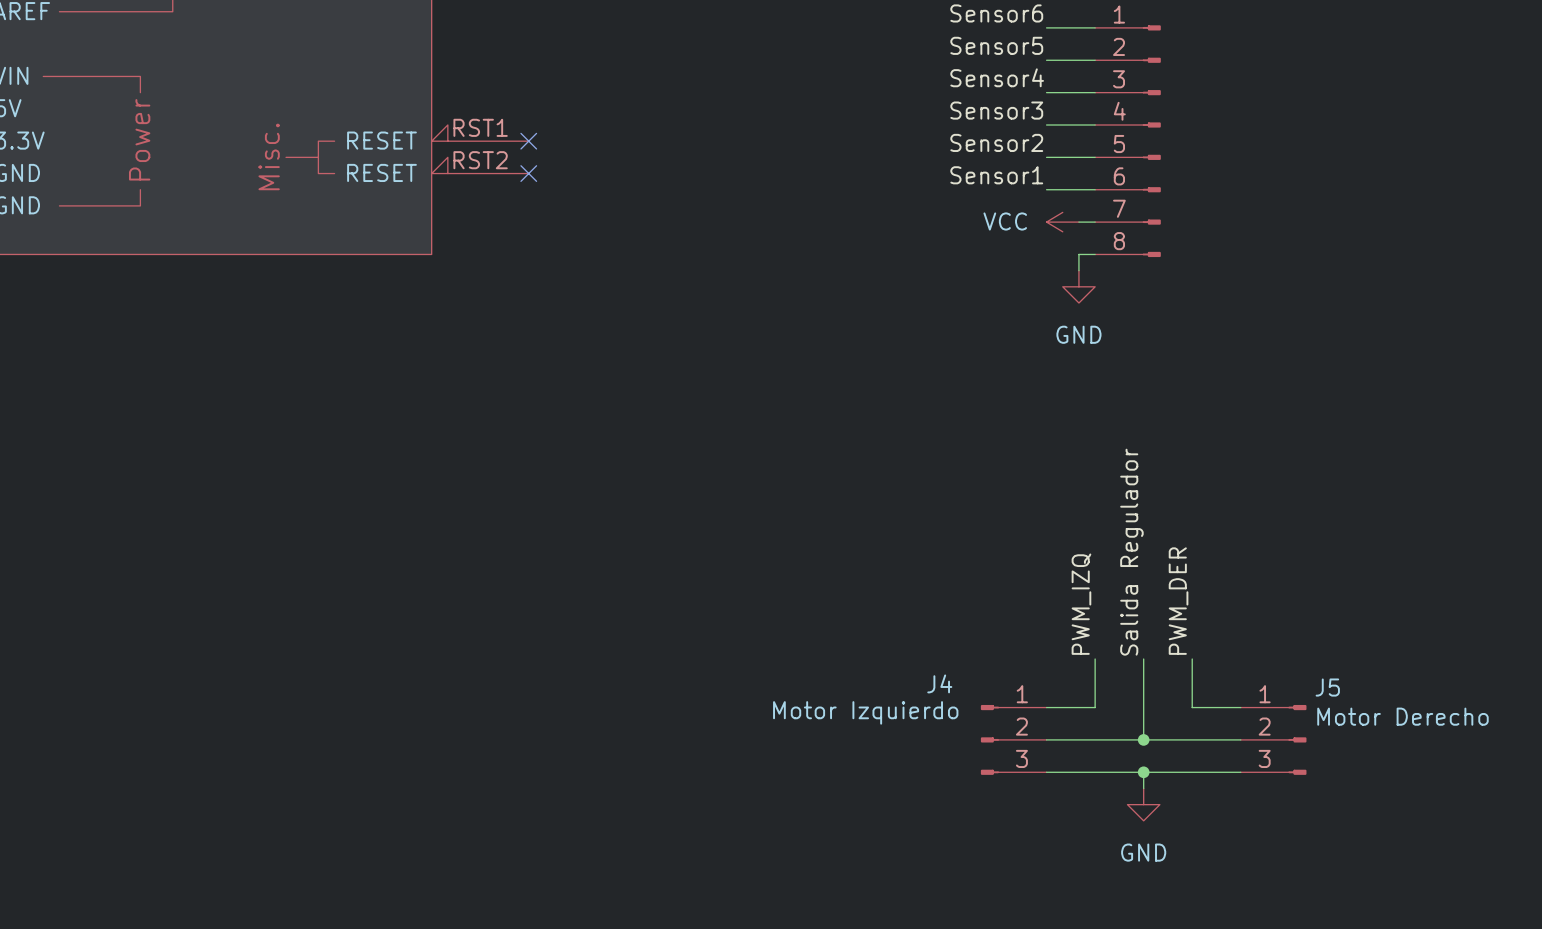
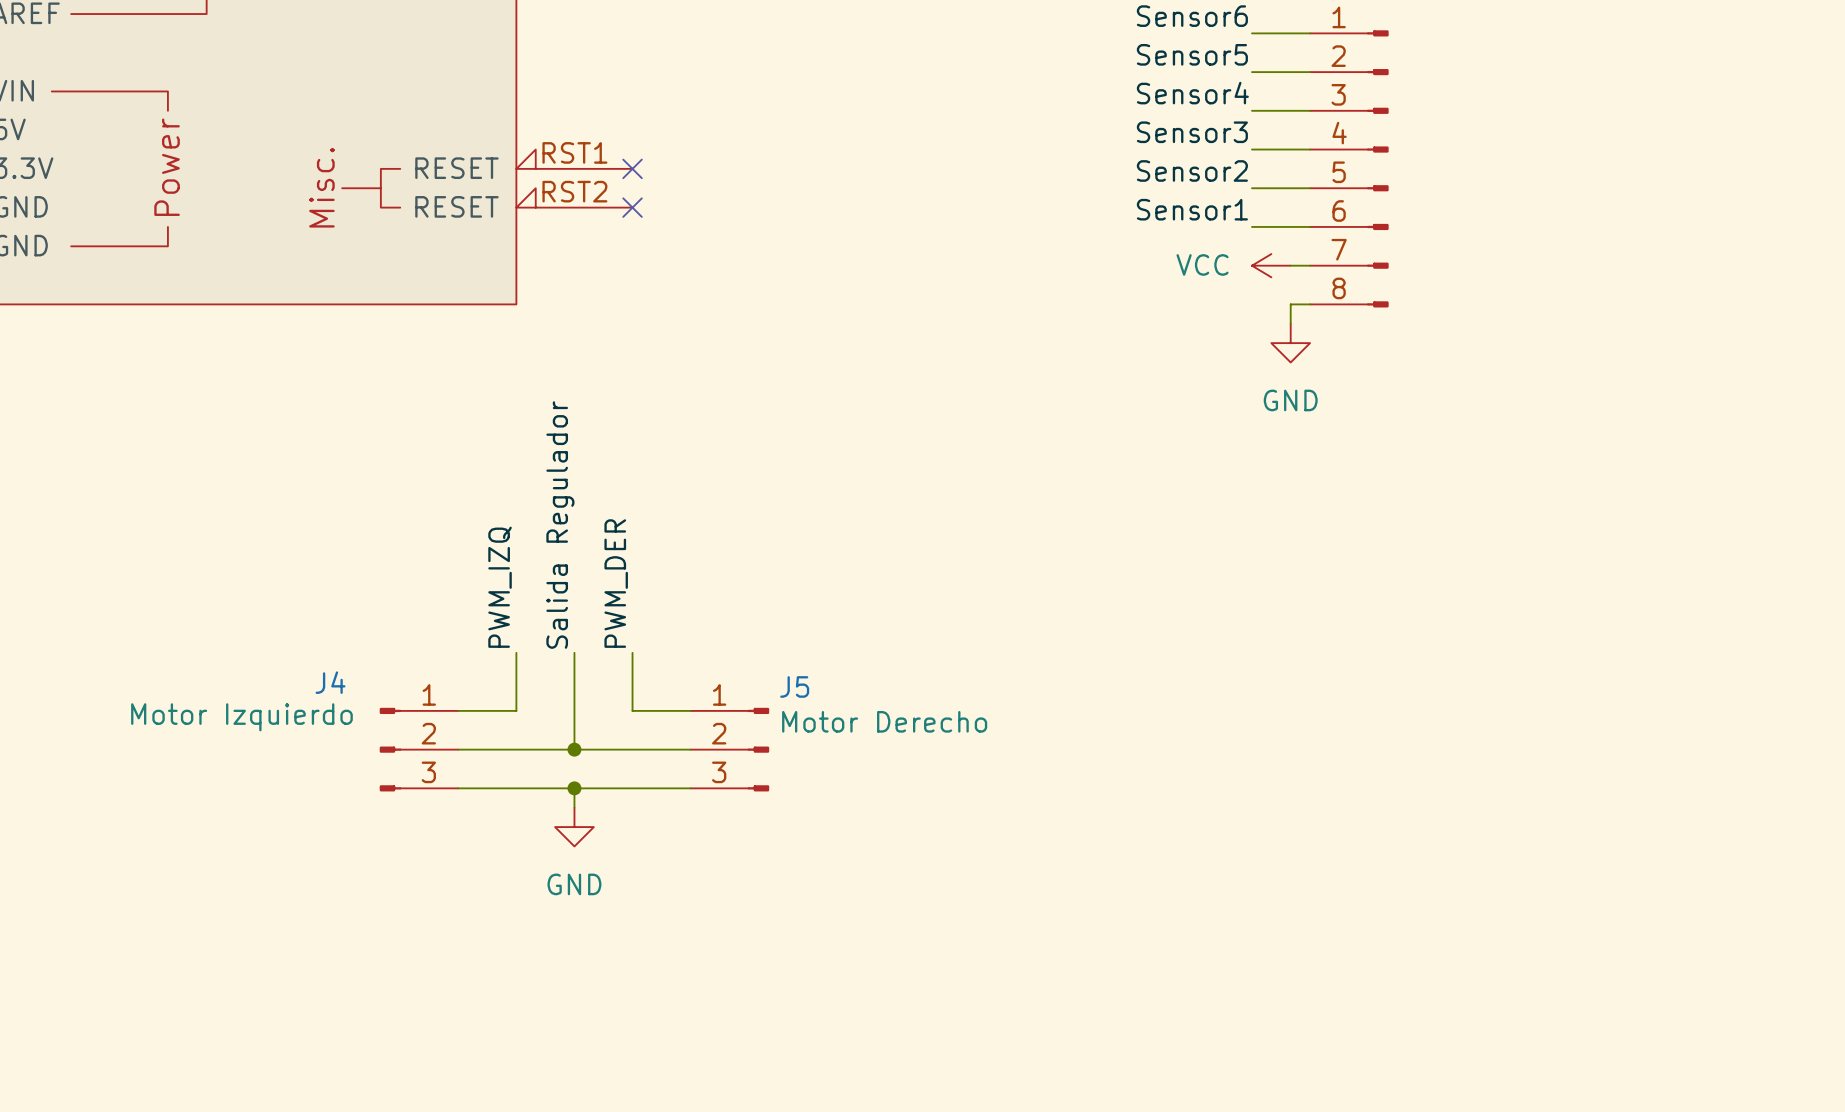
label: none -> Salida Regulador (560, 525)
label: none -> PWM_DER (616, 583)
label: none -> PWM_IZQ (500, 587)
wire: none -> (516, 652) (516, 710) (458, 710)
wire: none -> (574, 652) (574, 749)
wire: none -> (632, 652) (632, 710) (690, 710)
label: Salida Regulador (1131, 552) -> none
label: PWM_DER (1178, 601) -> none
label: PWM_IZQ (1081, 604) -> none
wire: none -> (458, 749) (690, 749)
junction: none -> (574, 749)
wire: none -> (458, 788) (690, 788)
wire: none -> (574, 788) (574, 807)
junction: none -> (574, 788)
wire: (1095, 659) (1095, 707) (1046, 707) -> none
wire: (1143, 659) (1143, 739) -> none
wire: (1192, 659) (1192, 707) (1240, 707) -> none
power symbol: none -> GND (574, 827)
J4 position: (1013, 739) -> (419, 749)
wire: (1046, 739) (1240, 739) -> none
junction: (1143, 739) -> none
J5 position: (1273, 739) -> (729, 749)
wire: (1046, 772) (1240, 772) -> none
wire: (1143, 772) (1143, 788) -> none
junction: (1143, 772) -> none
power symbol: GND (1143, 804) -> none

